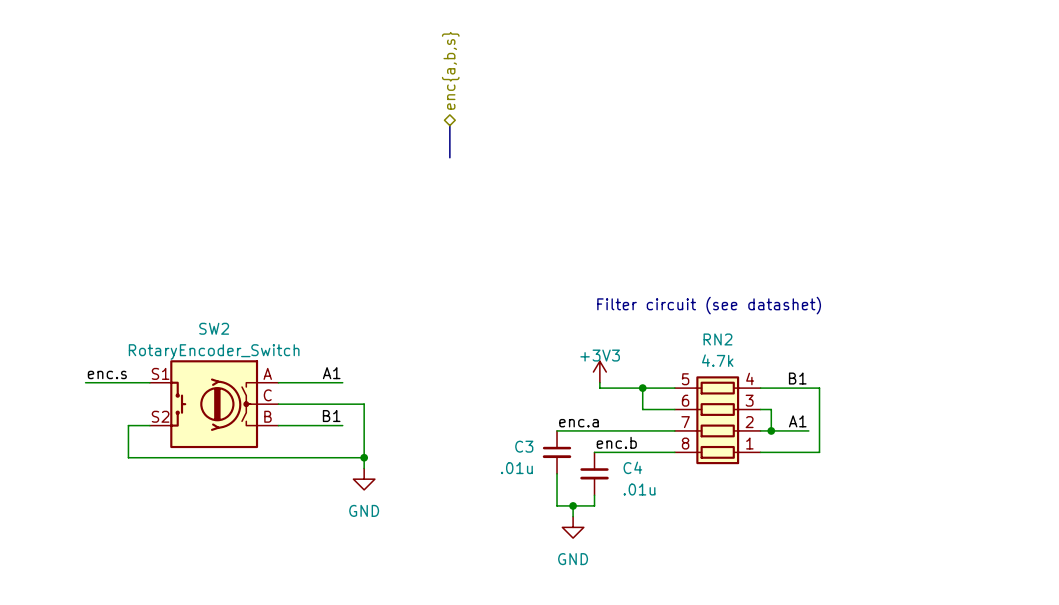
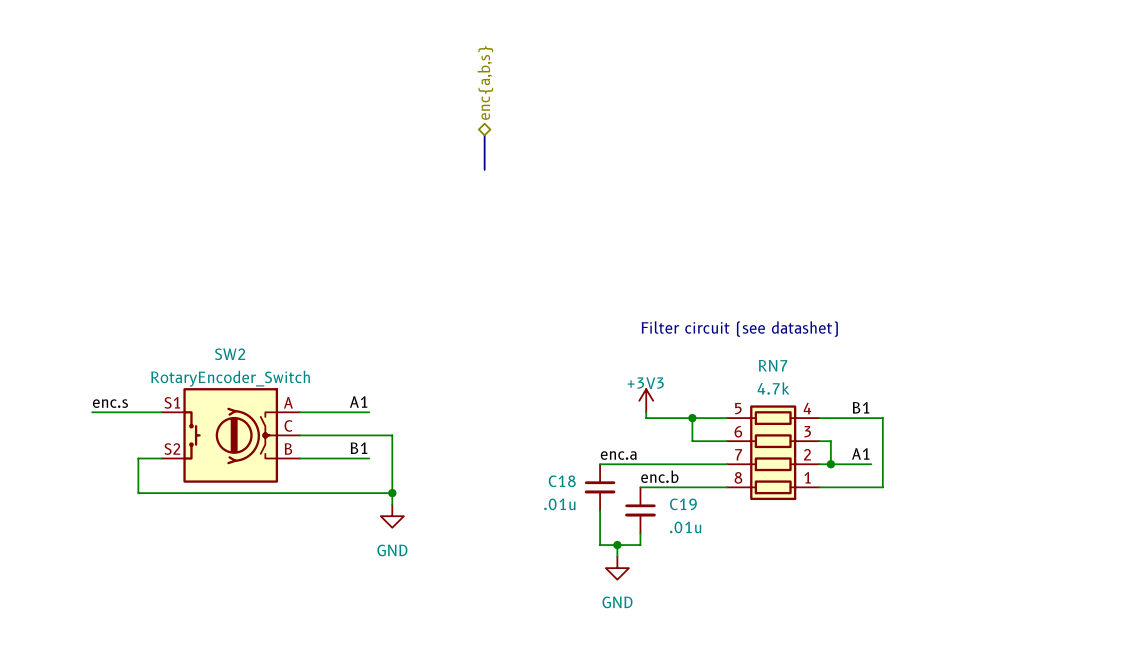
RN2 name: RN2 (717, 339) -> RN7 (773, 365)
C3 name: C3 (524, 446) -> C18 (562, 481)
C4 name: C4 (632, 467) -> C19 (683, 504)

